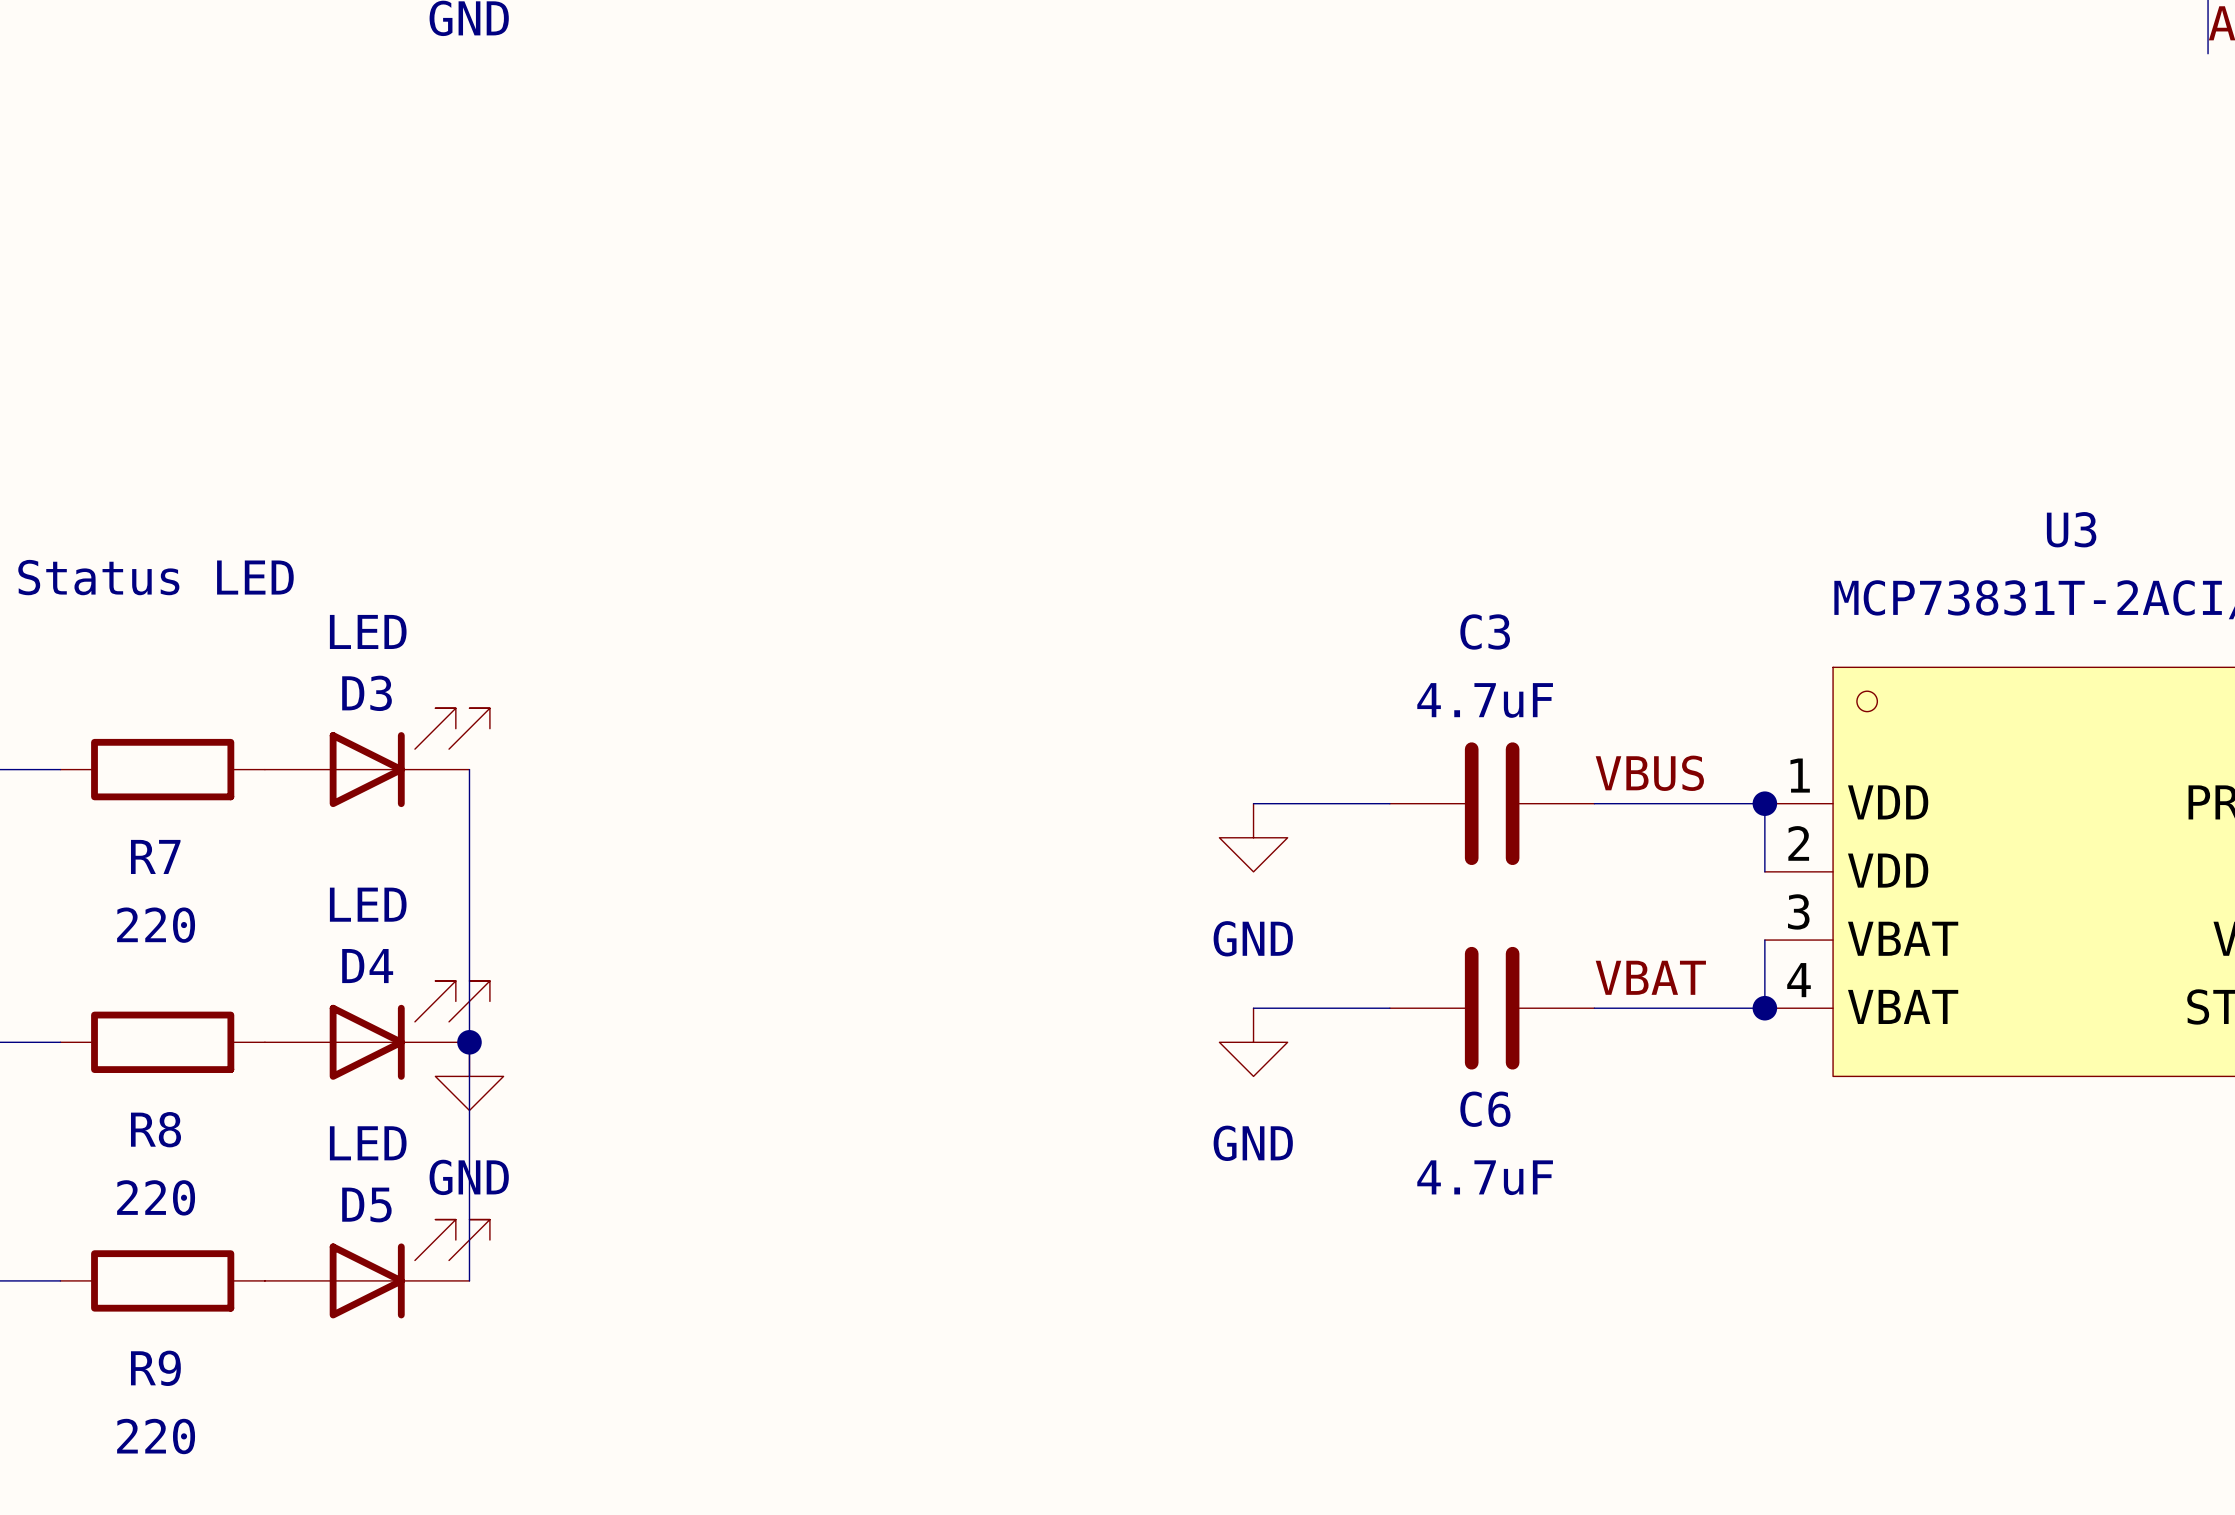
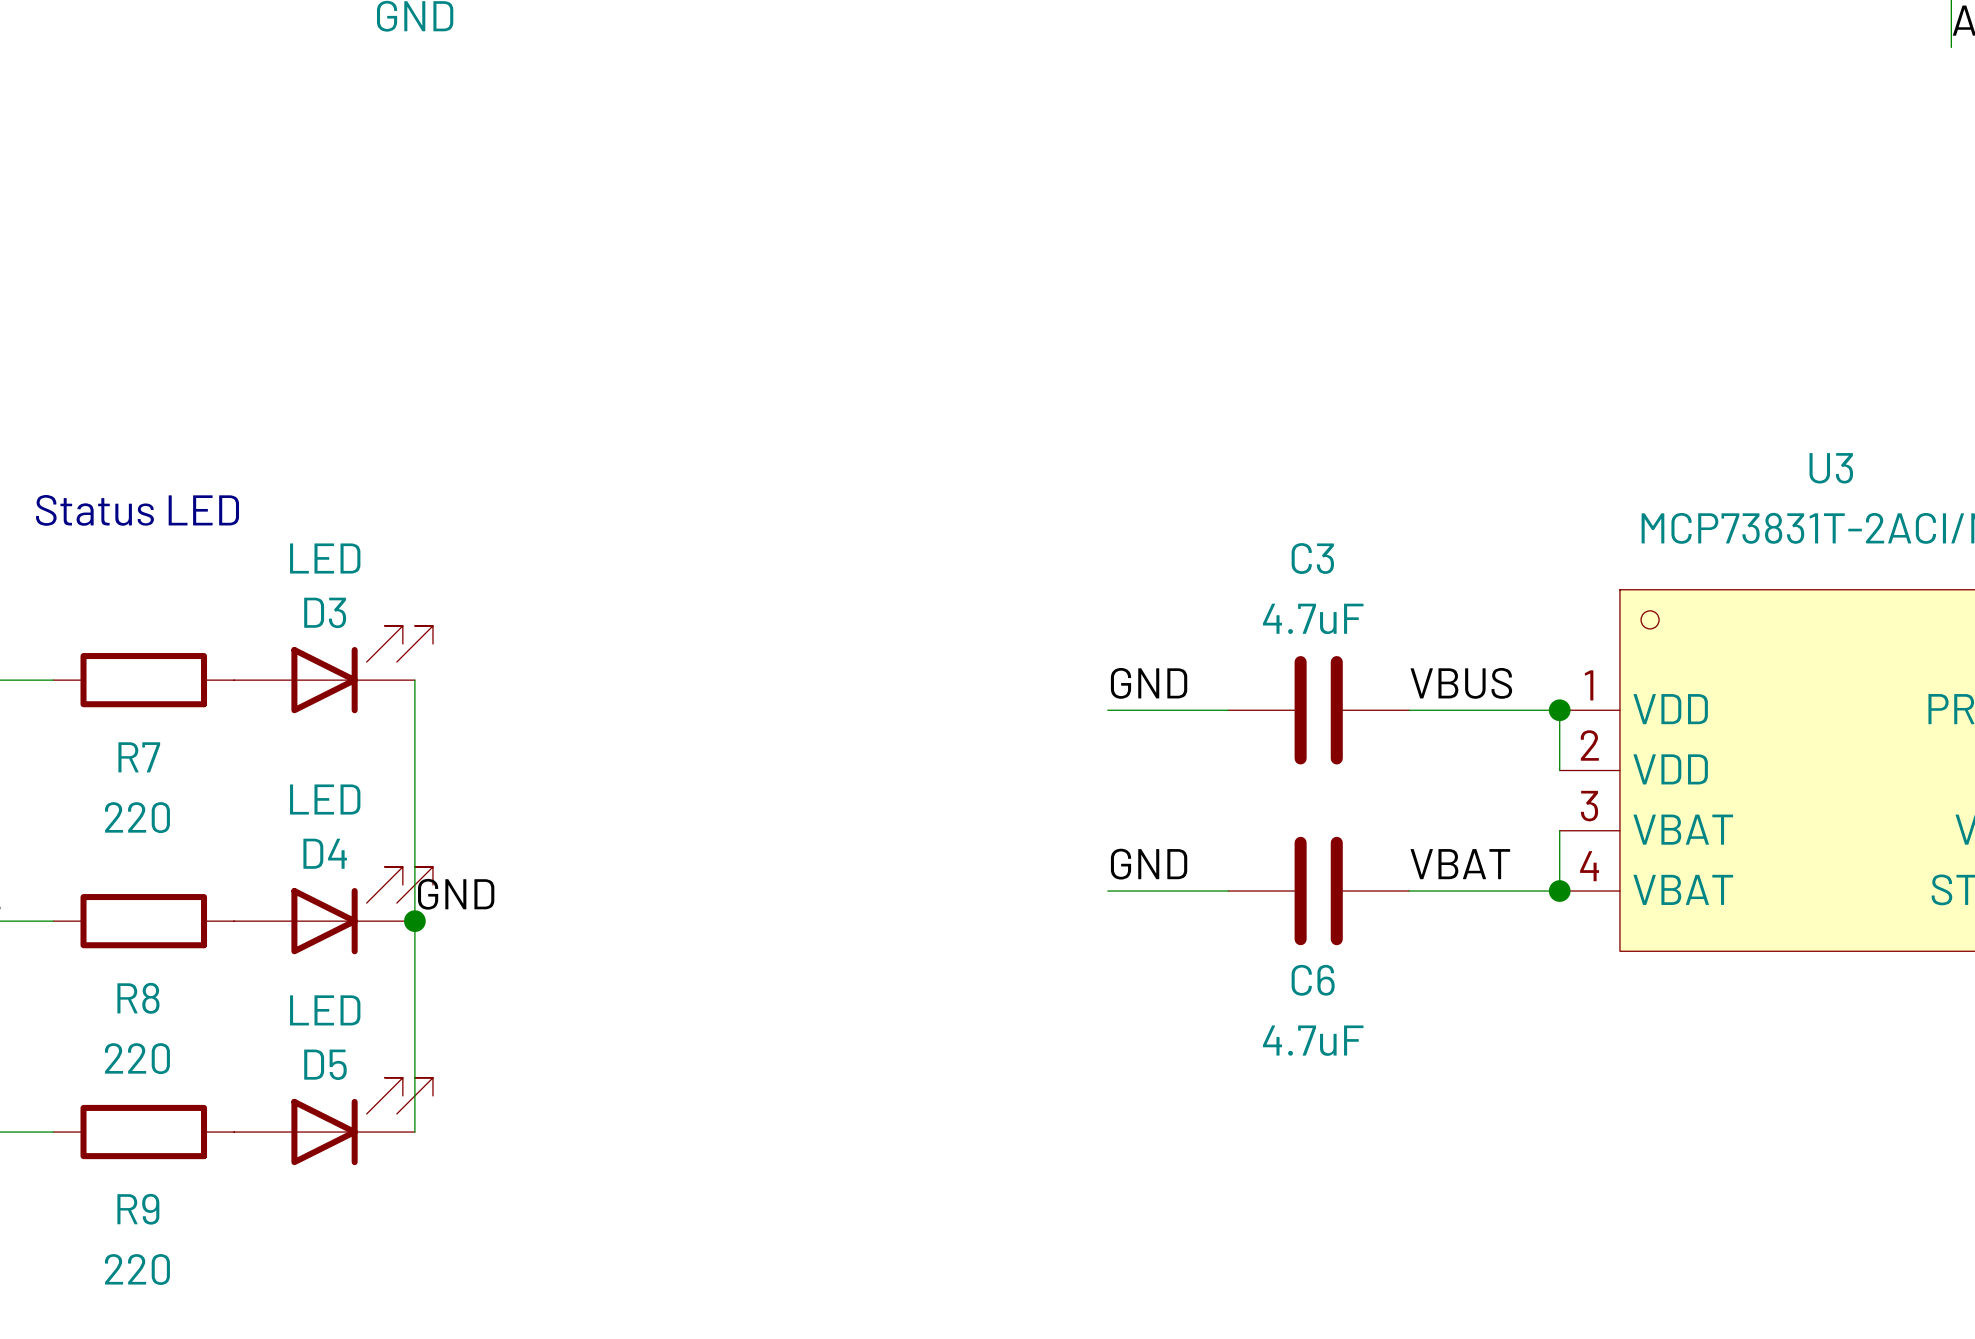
label: none -> GND (1149, 683)
power symbol: GND (1253, 837) -> none
label: none -> GND (1149, 864)
label: none -> GND (456, 894)
power symbol: GND (1253, 1042) -> none
power symbol: GND (469, 1076) -> none

